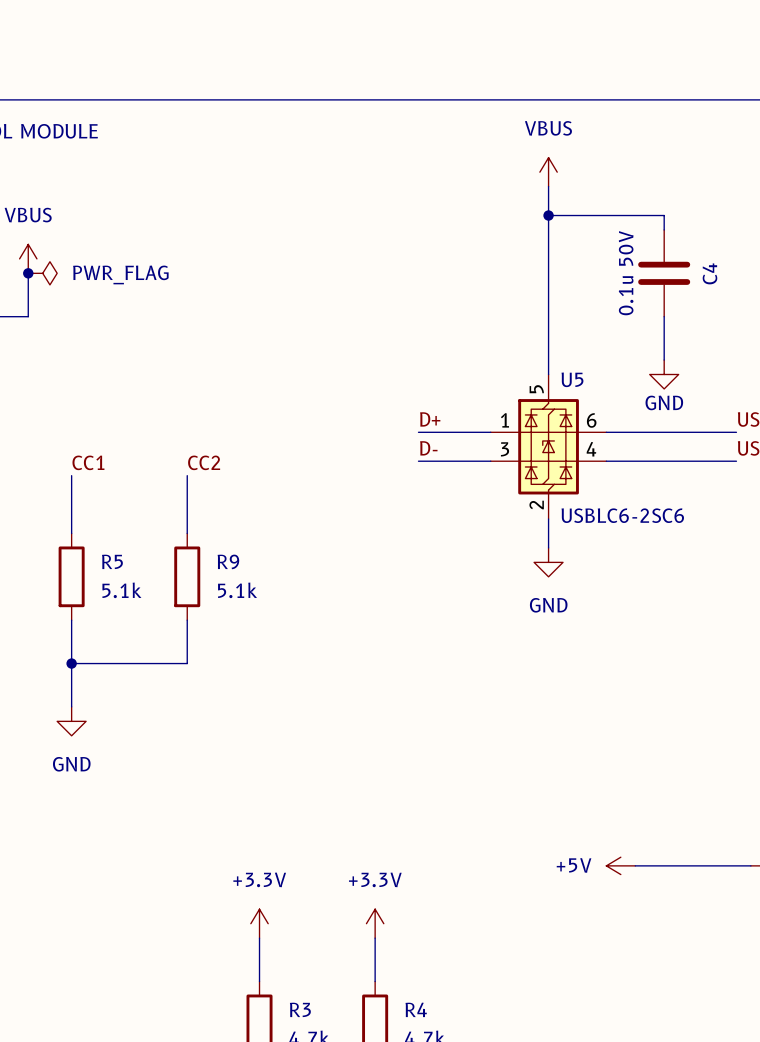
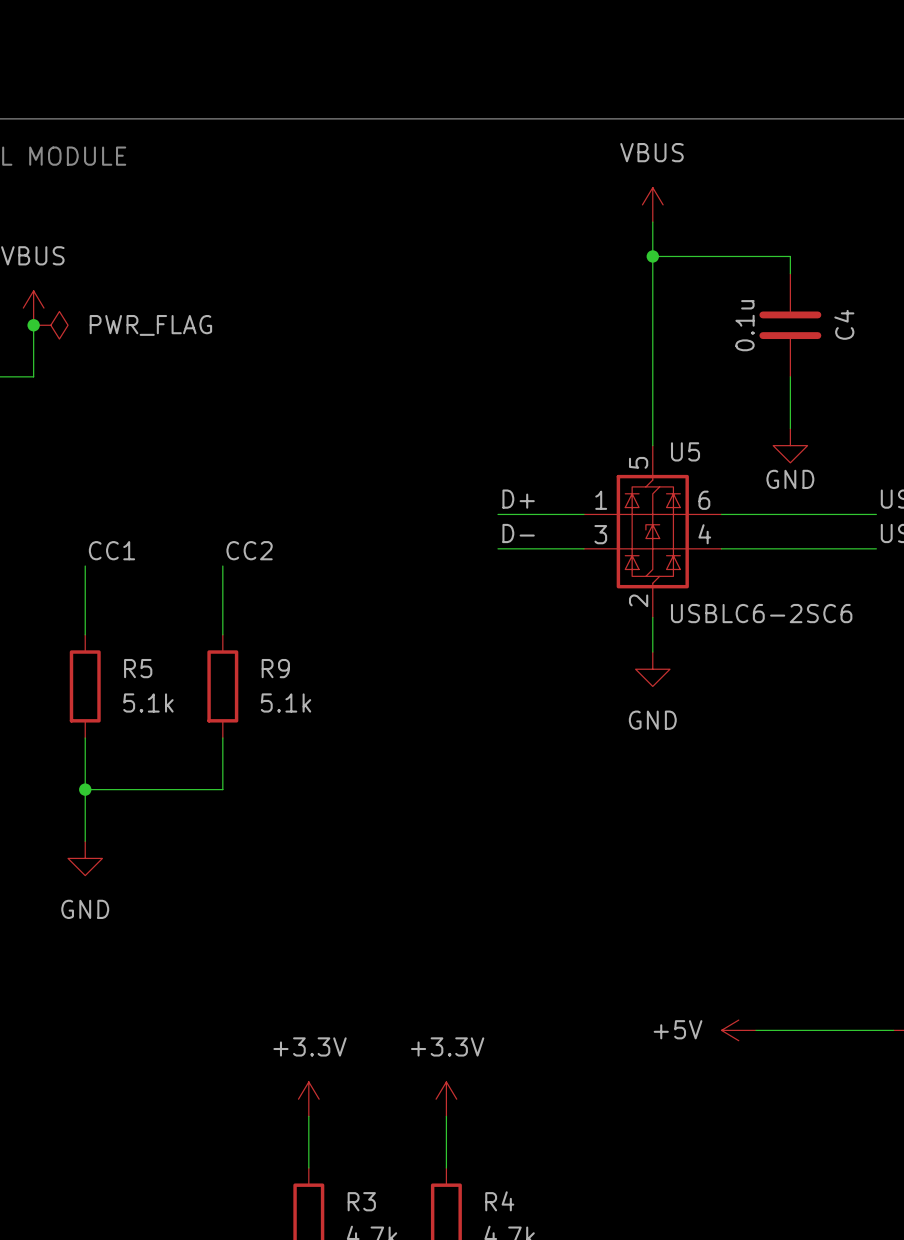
C4 value: 0.1u 50V (626, 273) -> 0.1u (745, 325)

